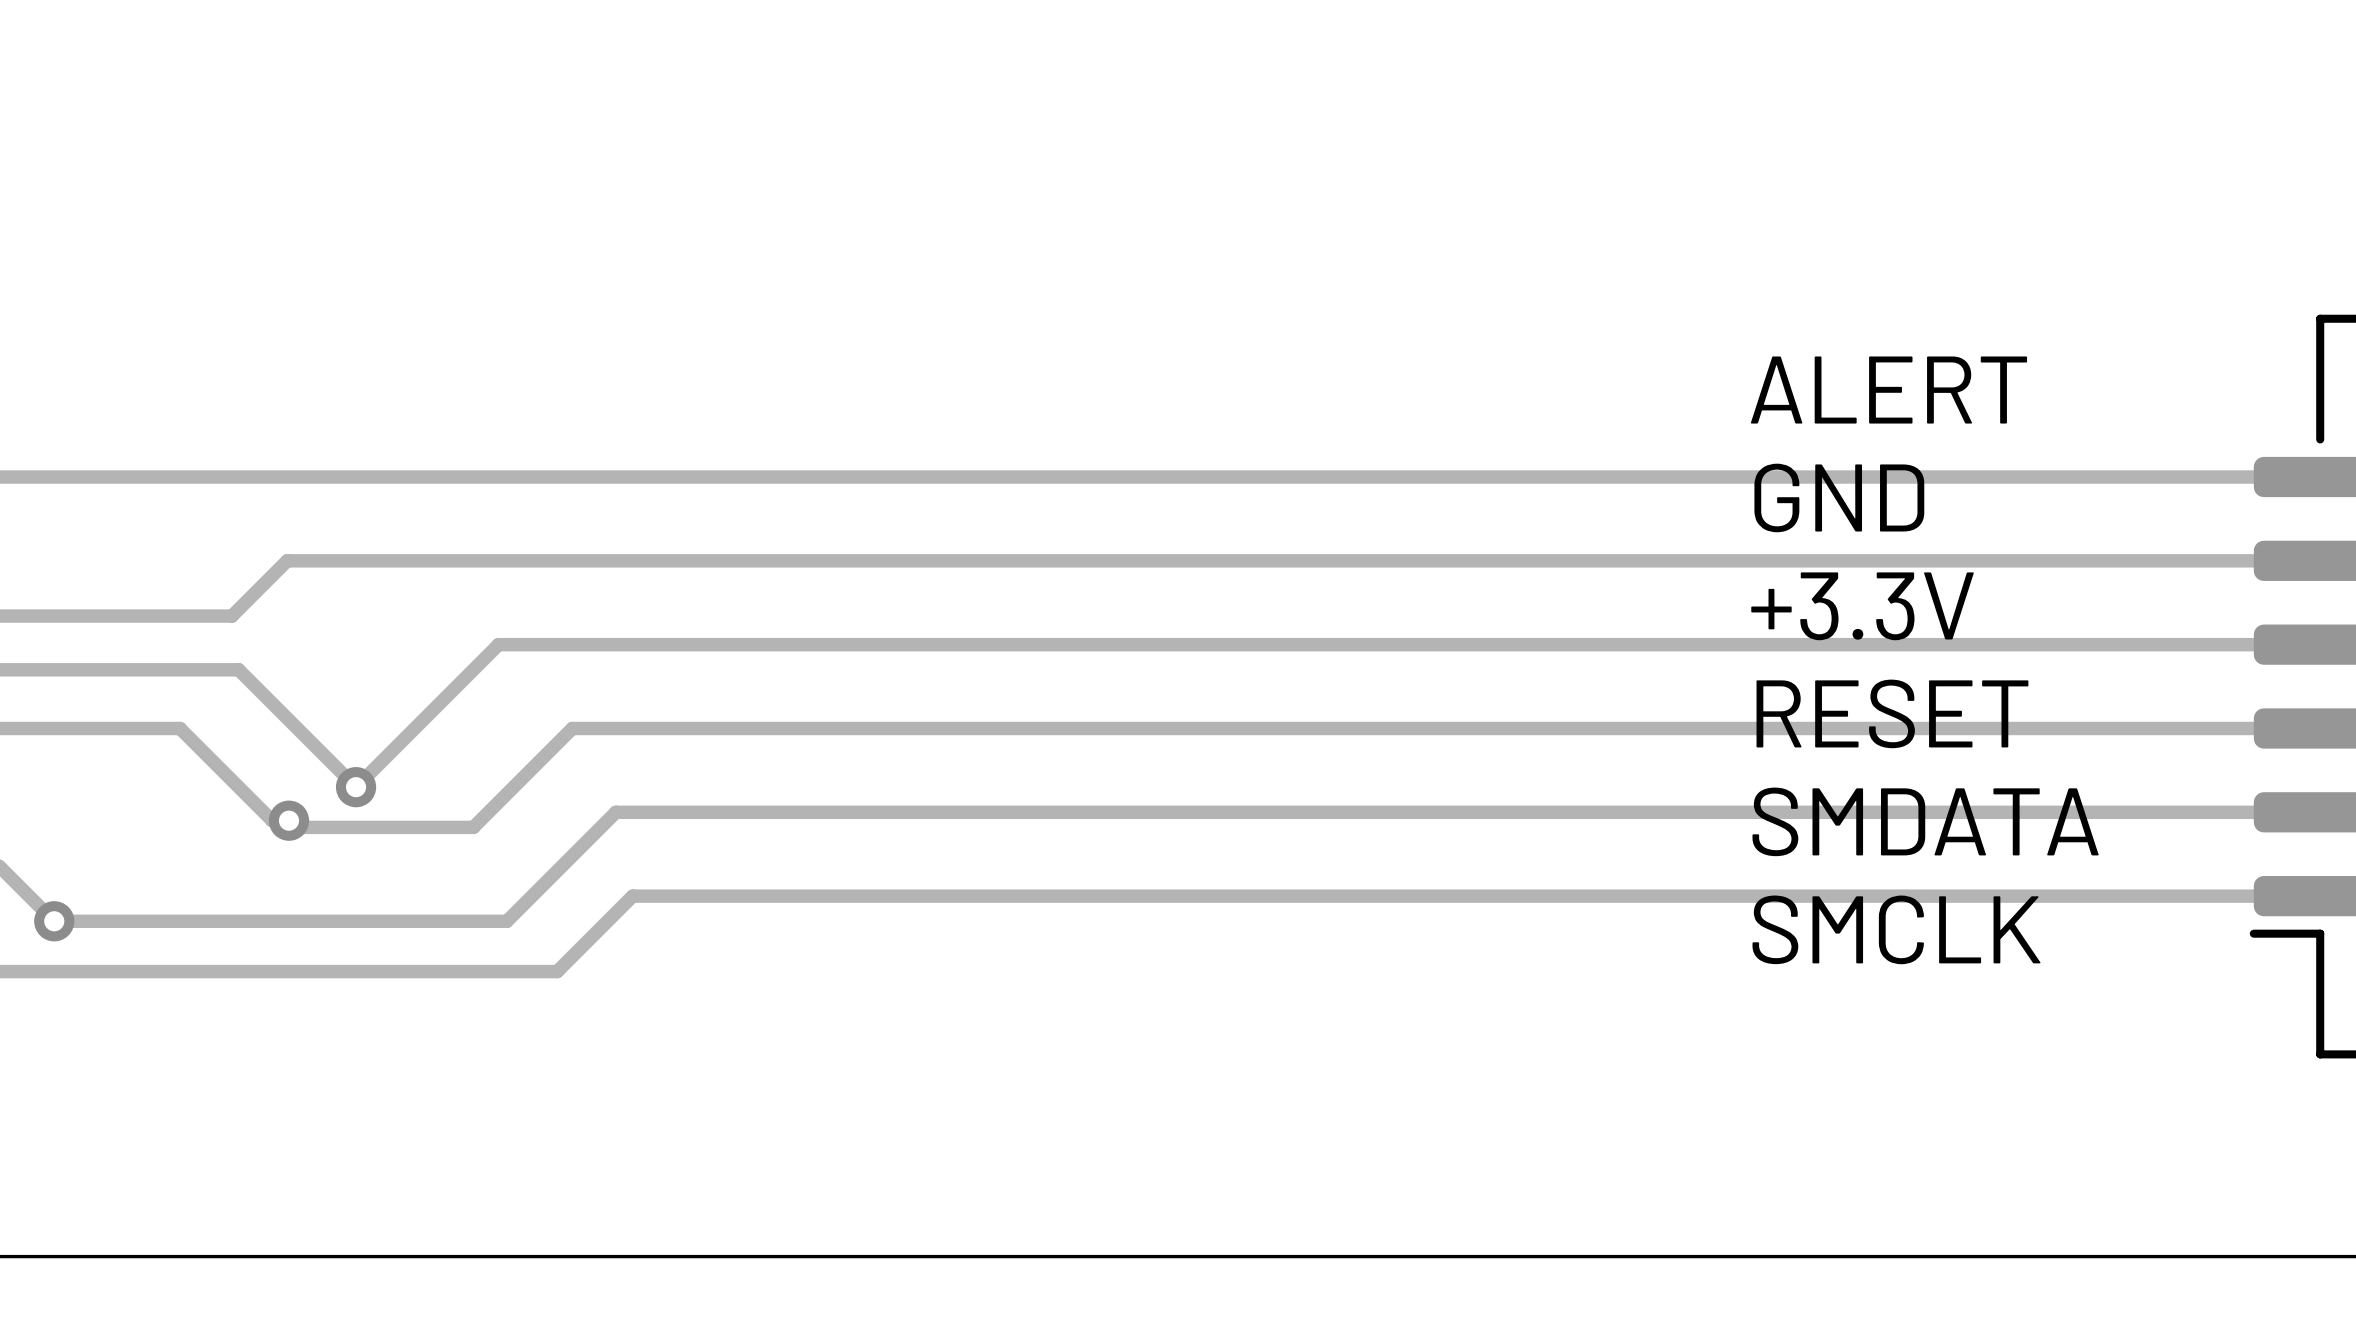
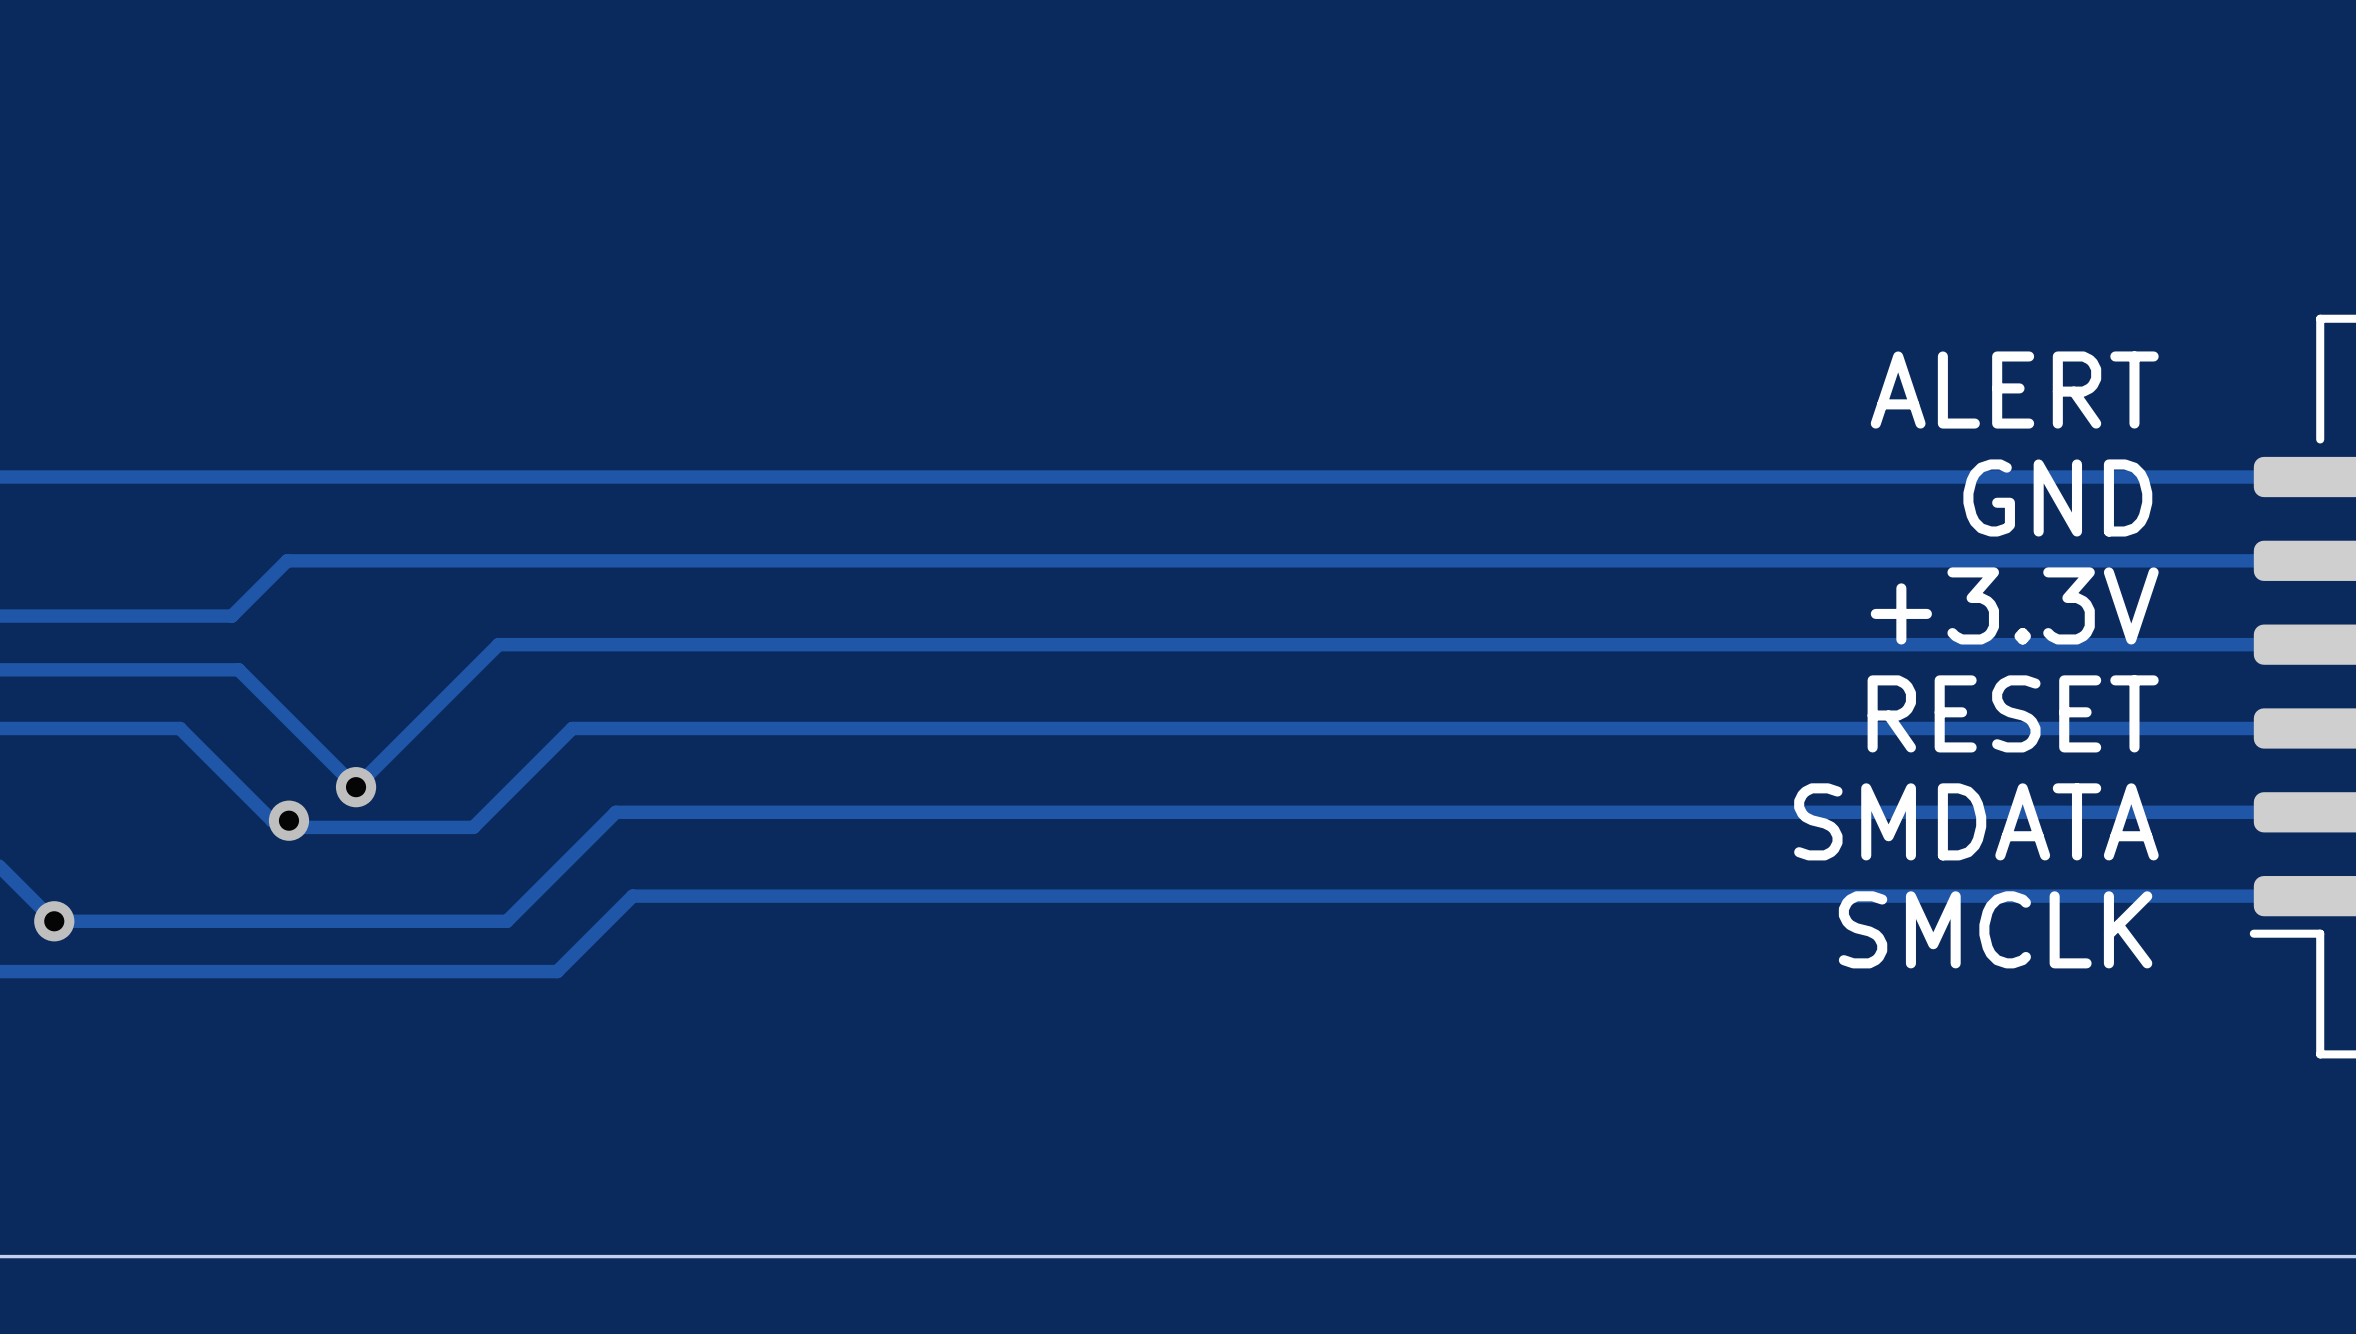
text position: ALERT (1888, 390) -> ALERT (2014, 390)
text position: GND (1839, 497) -> GND (2057, 497)
text position: +3.3V (1862, 606) -> +3.3V (2014, 605)
text position: RESET (1892, 713) -> RESET (2013, 713)
text position: SMDATA (1925, 821) -> SMDATA (1976, 821)
text position: SMCLK (1896, 929) -> SMCLK (1995, 929)

